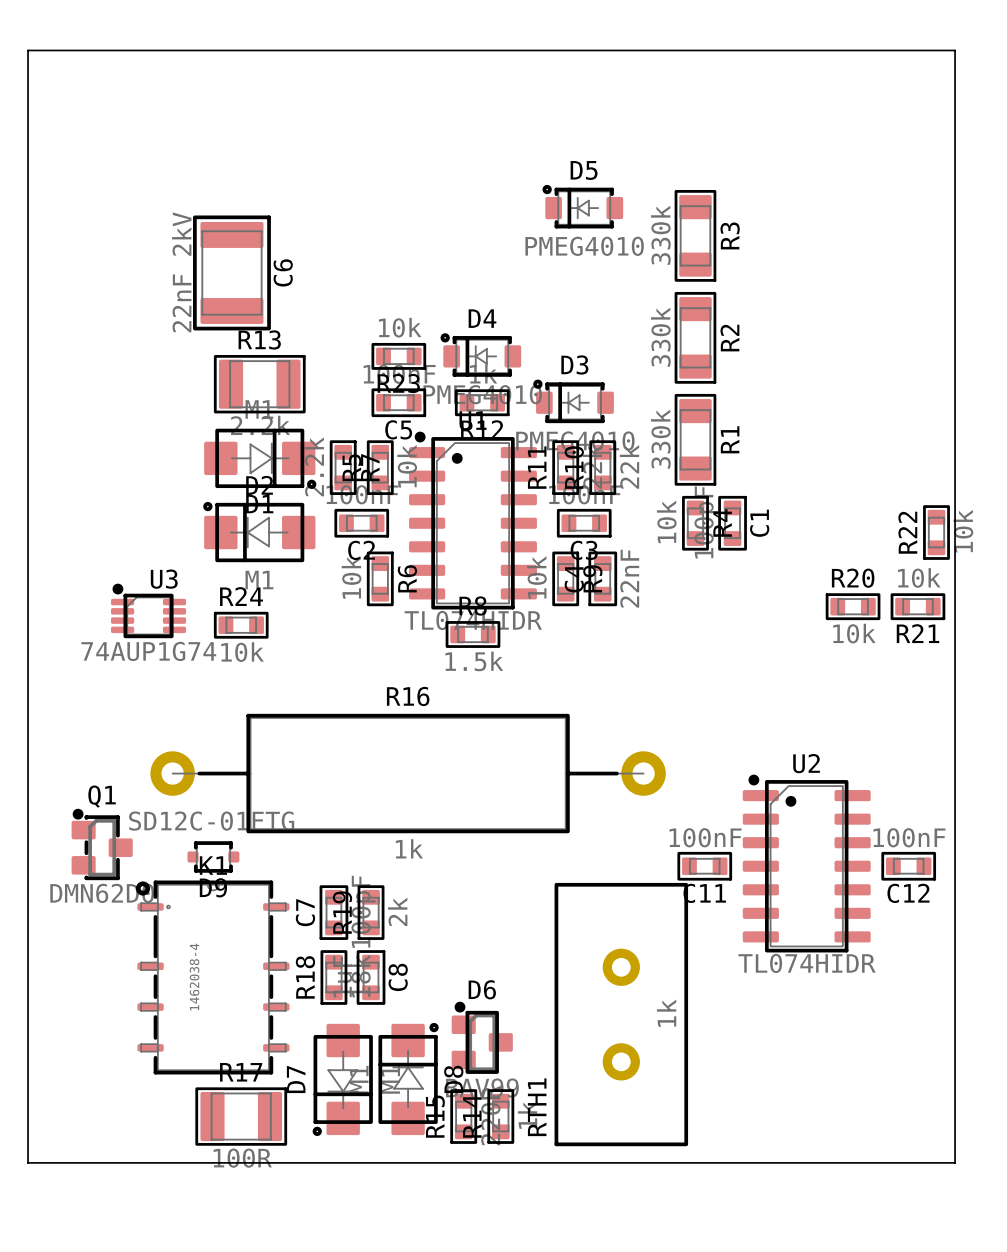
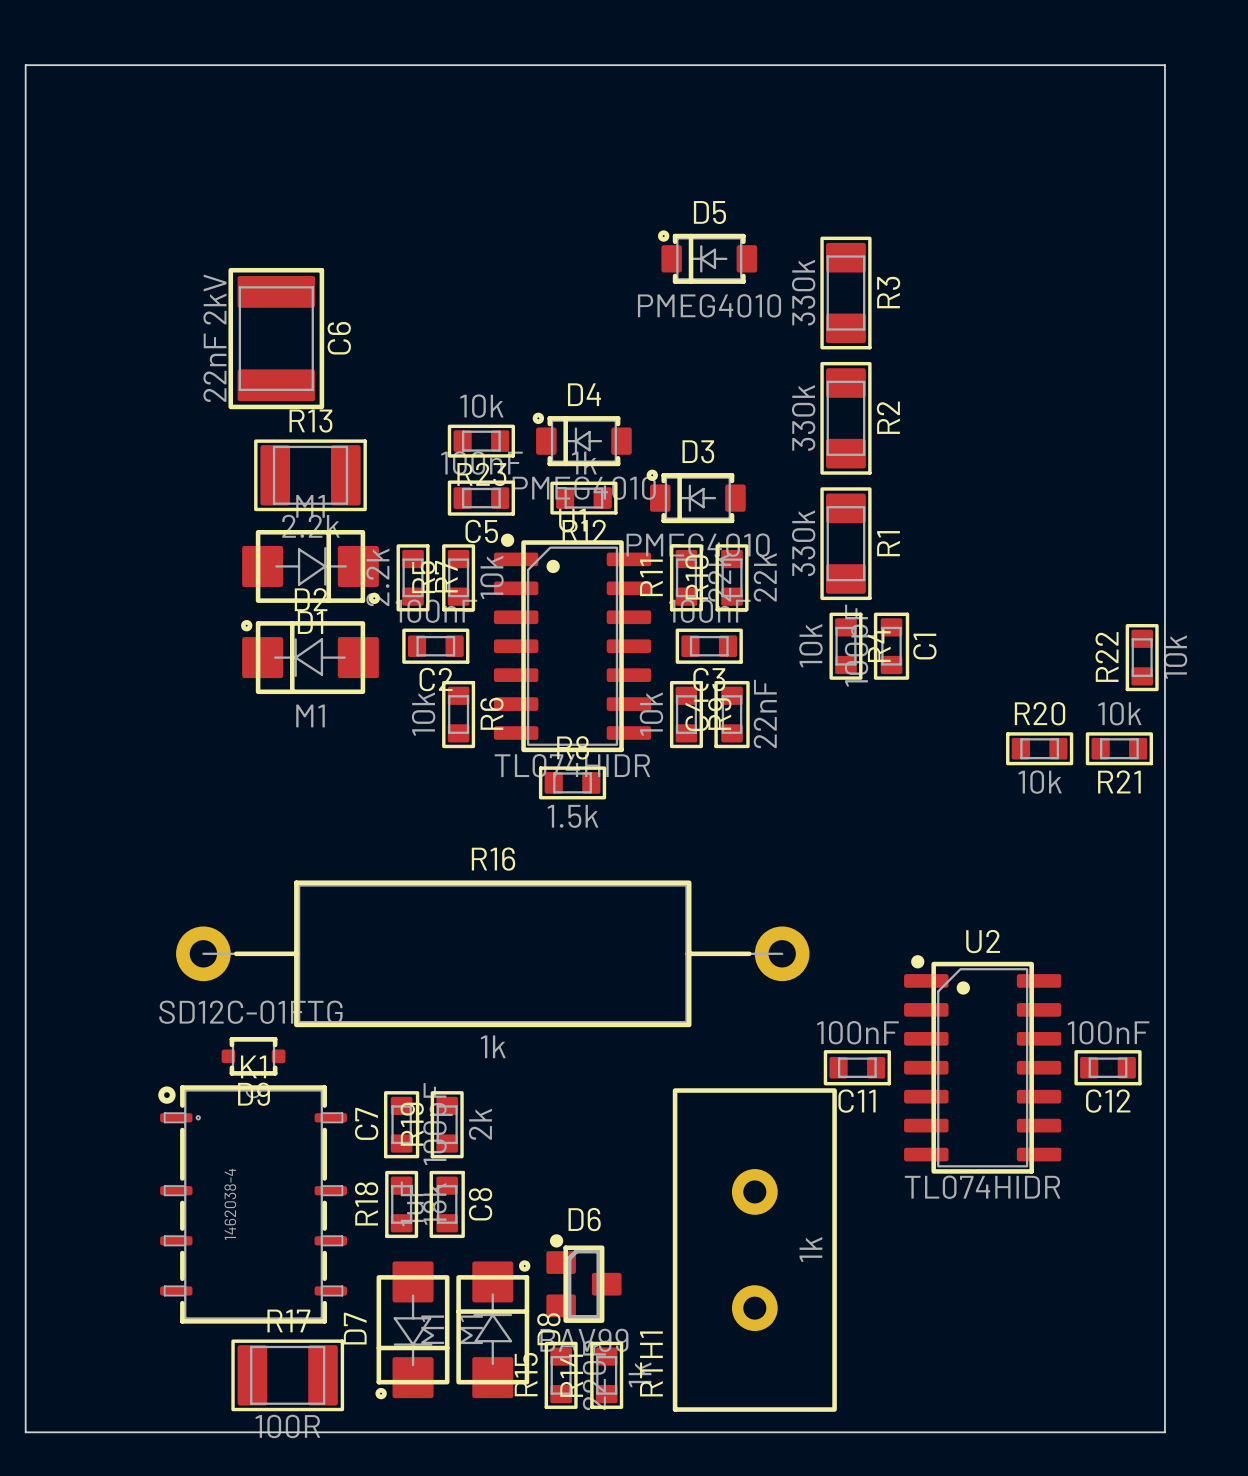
U3: 74AUP1G74 (148, 610) -> none
R24: 10k (241, 625) -> none
Q1: DMN62D0 (102, 844) -> none

